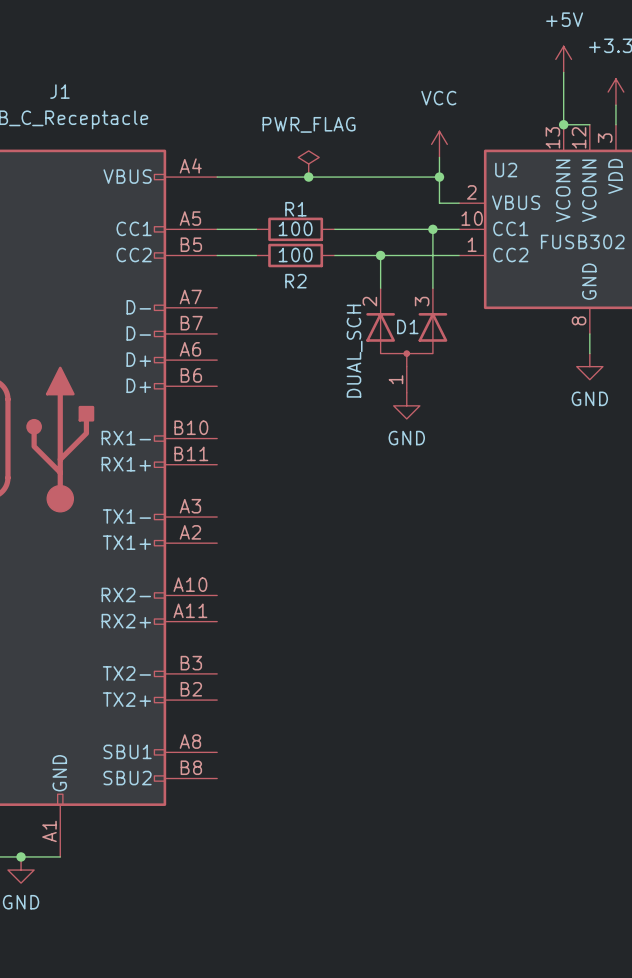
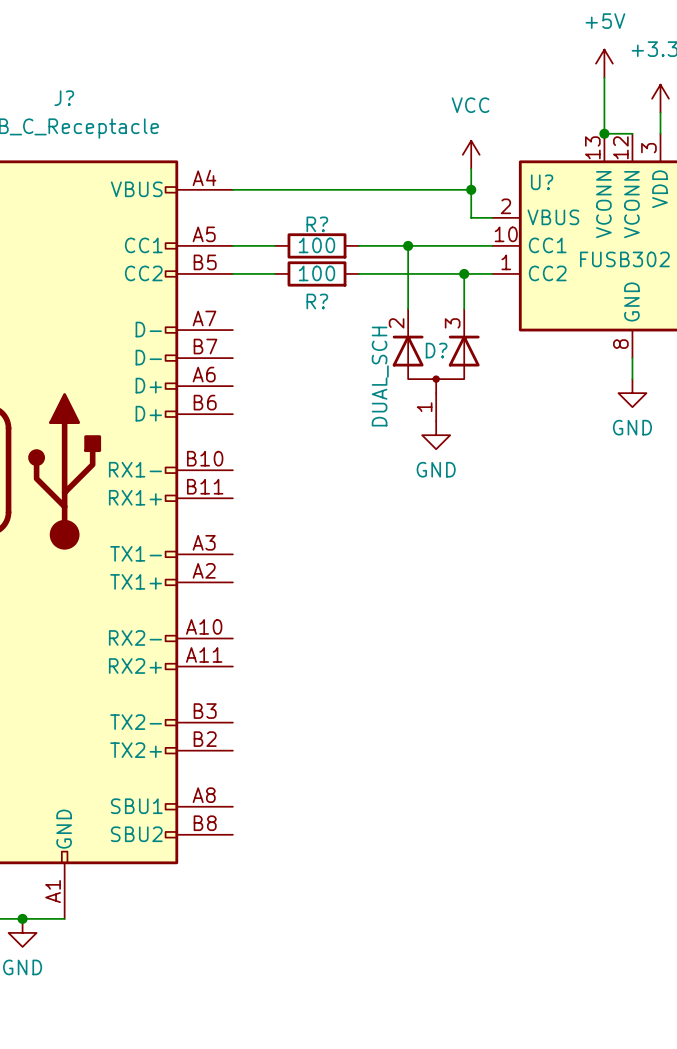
J1 name: J1 (59, 91) -> J? (64, 98)
power symbol: PWR_FLAG (308, 163) -> none
U2 name: U2 (506, 170) -> U? (542, 182)
junction: (308, 177) -> none
R1 name: R1 (295, 209) -> R? (317, 224)
junction: none -> (408, 245)
wire: (432, 229) (432, 255) -> (408, 245) (408, 273)
junction: (432, 229) -> none
junction: (380, 255) -> none
junction: none -> (464, 273)
R2 name: R2 (295, 281) -> R? (317, 301)
D1 name: D1 (407, 326) -> D? (436, 350)

